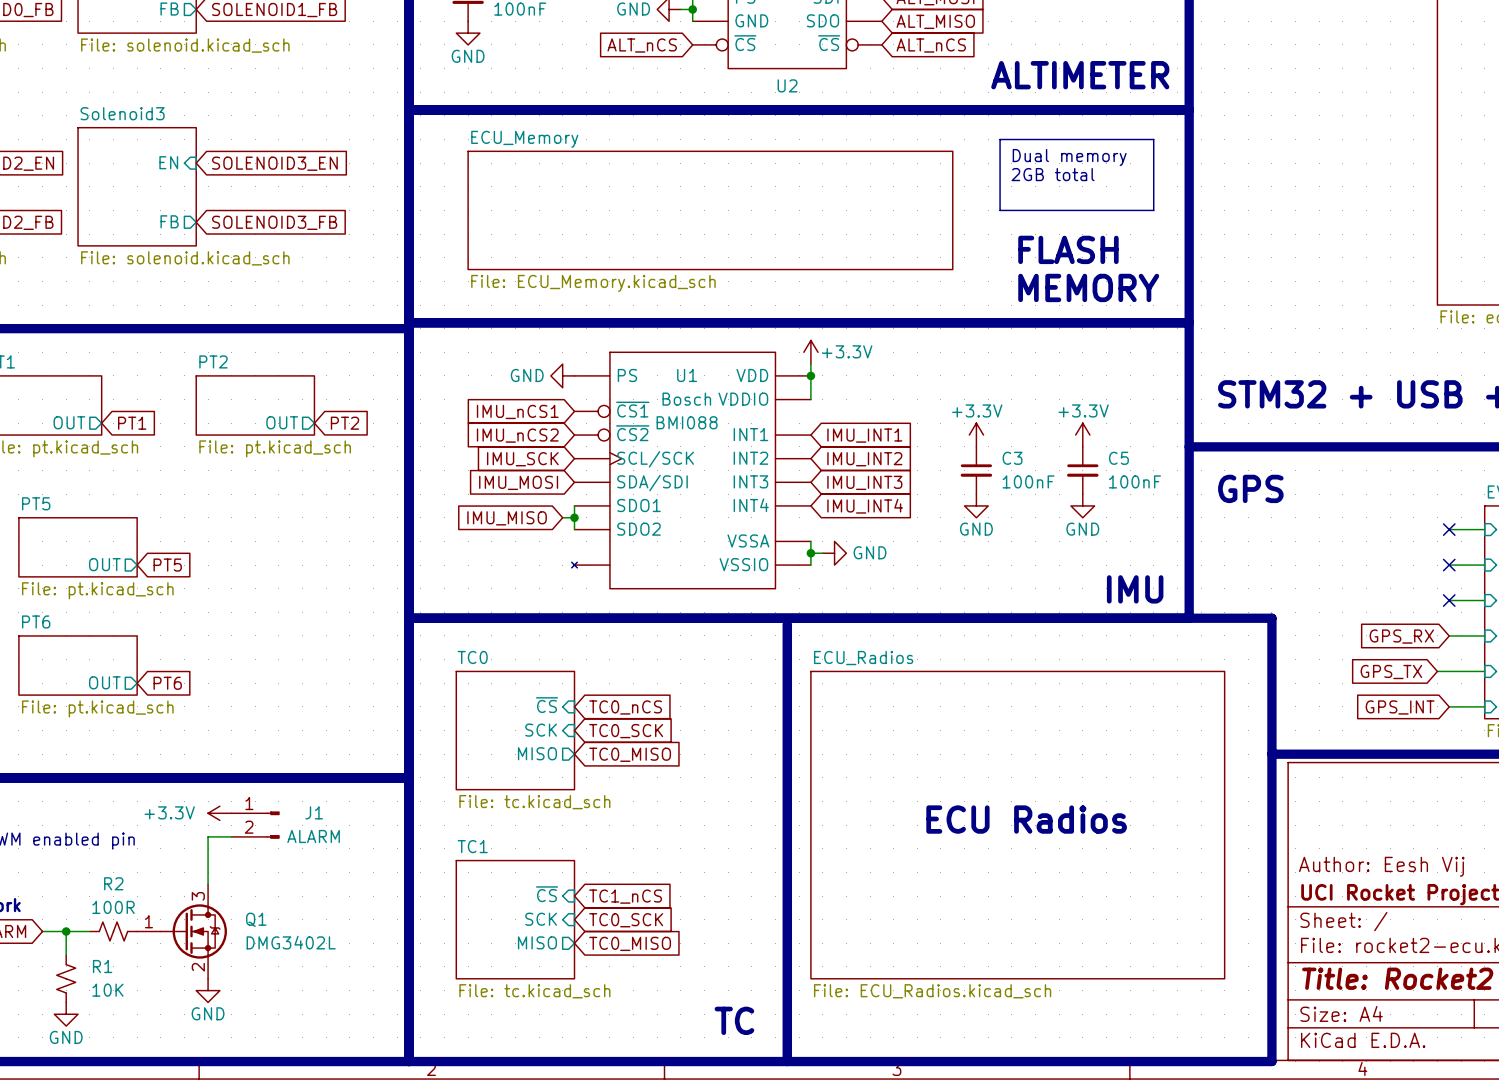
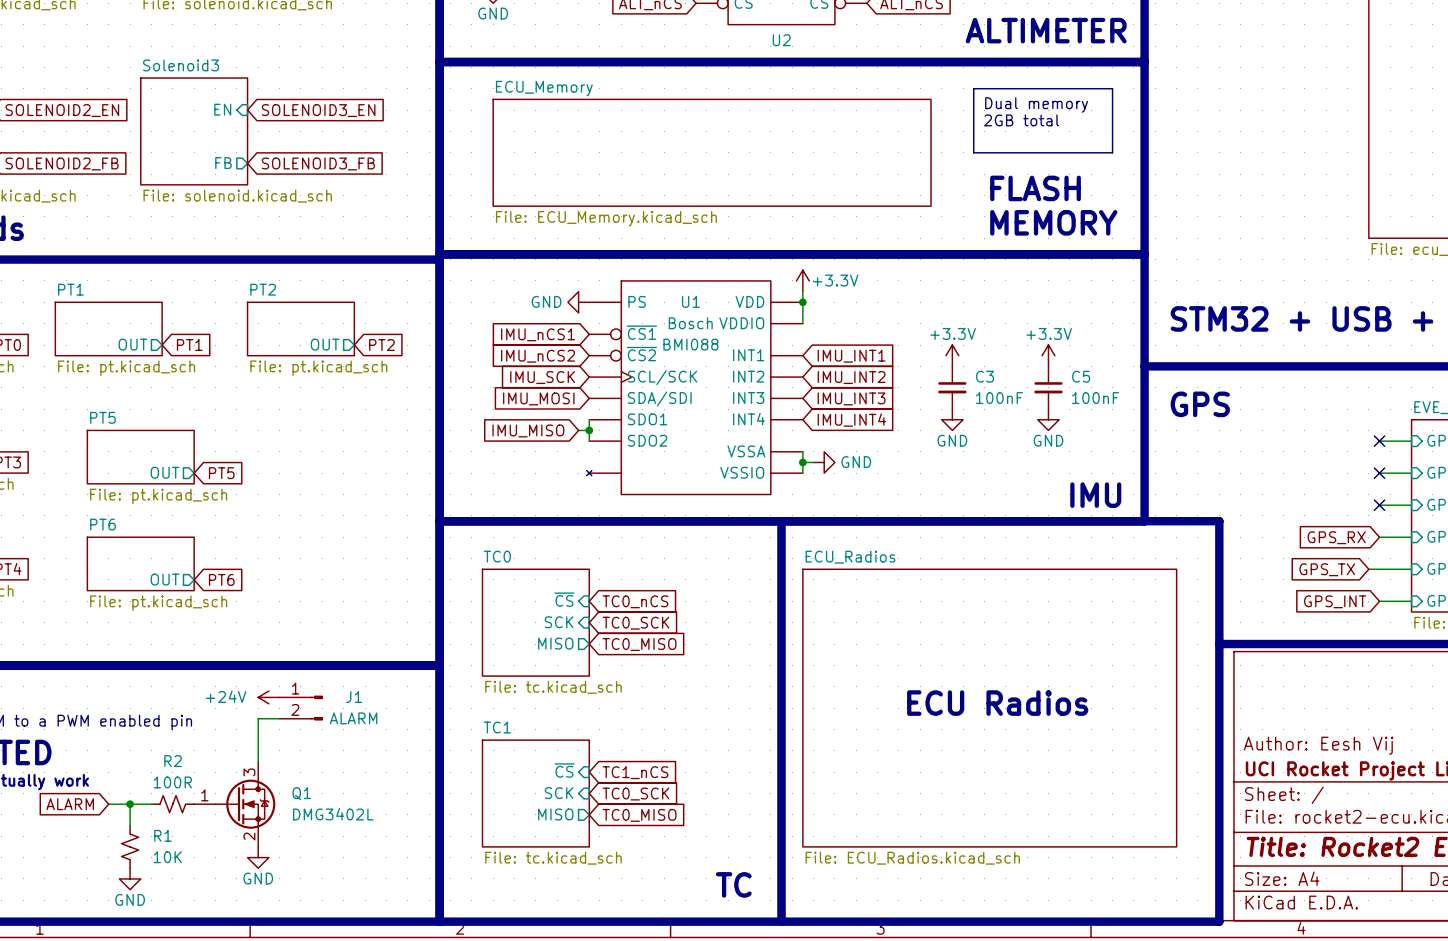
power symbol: +3.3V (219, 813) -> +24V (268, 697)

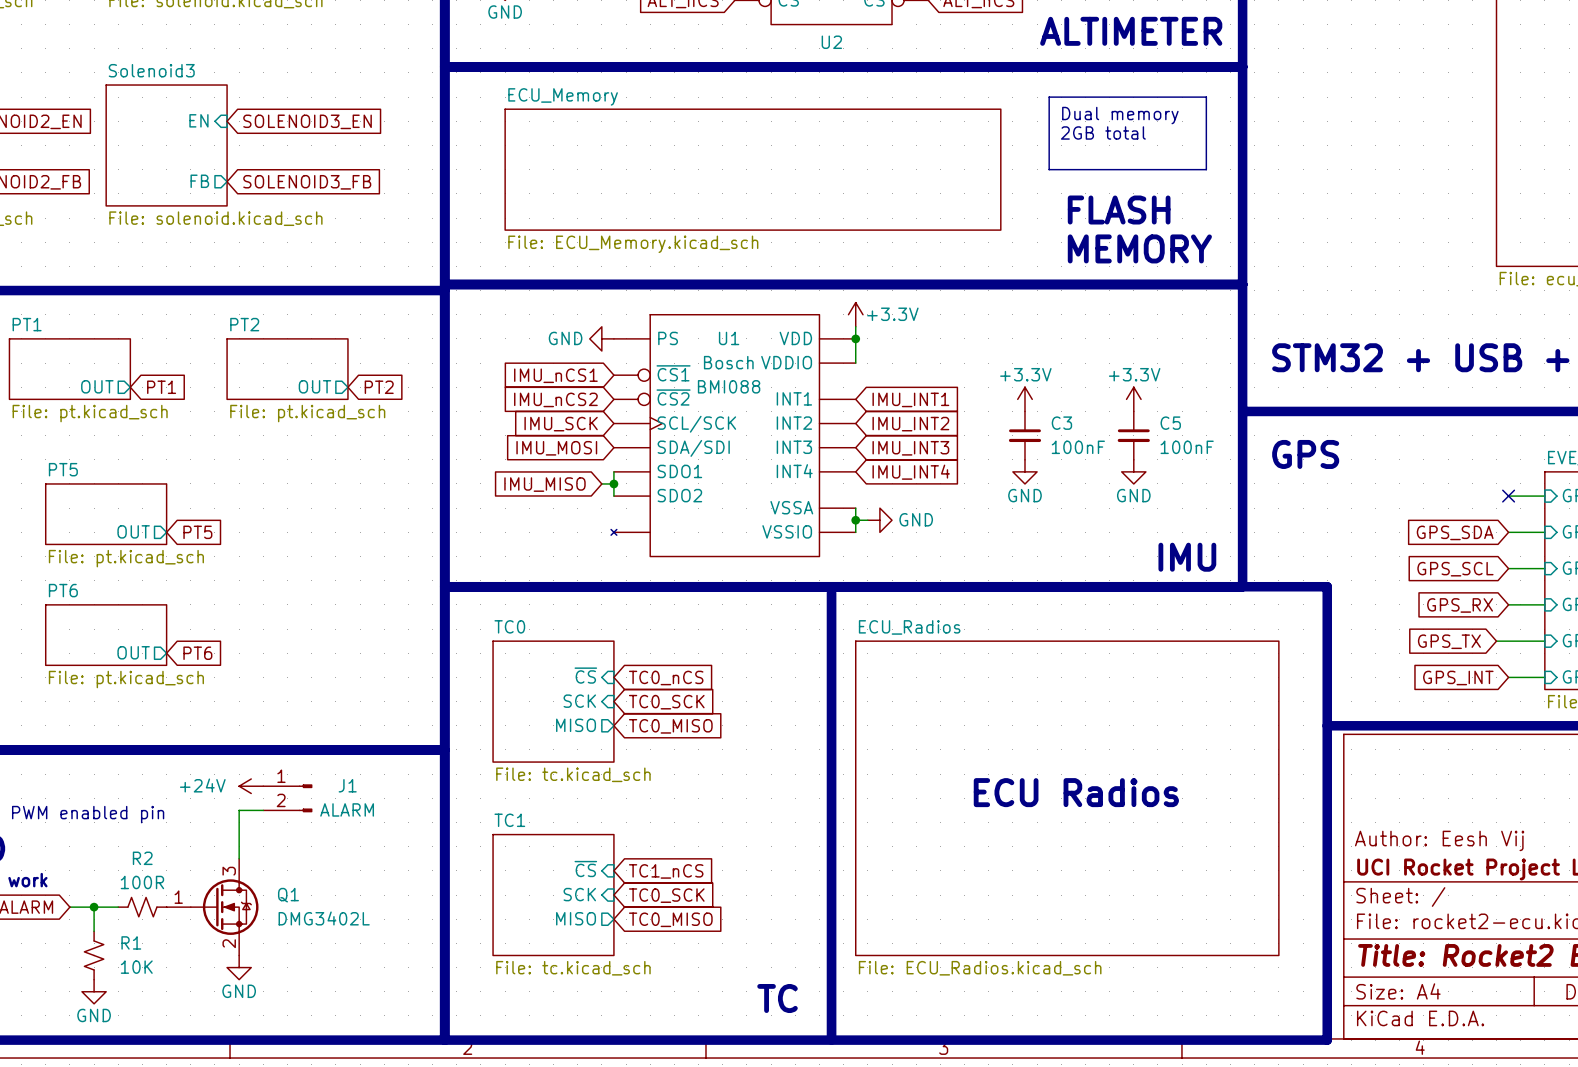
global label: none -> GPS_SDA (1455, 532)
no-connect mark: (1379, 473) -> none
global label: none -> GPS_SCL (1455, 569)
no-connect mark: (1379, 505) -> none

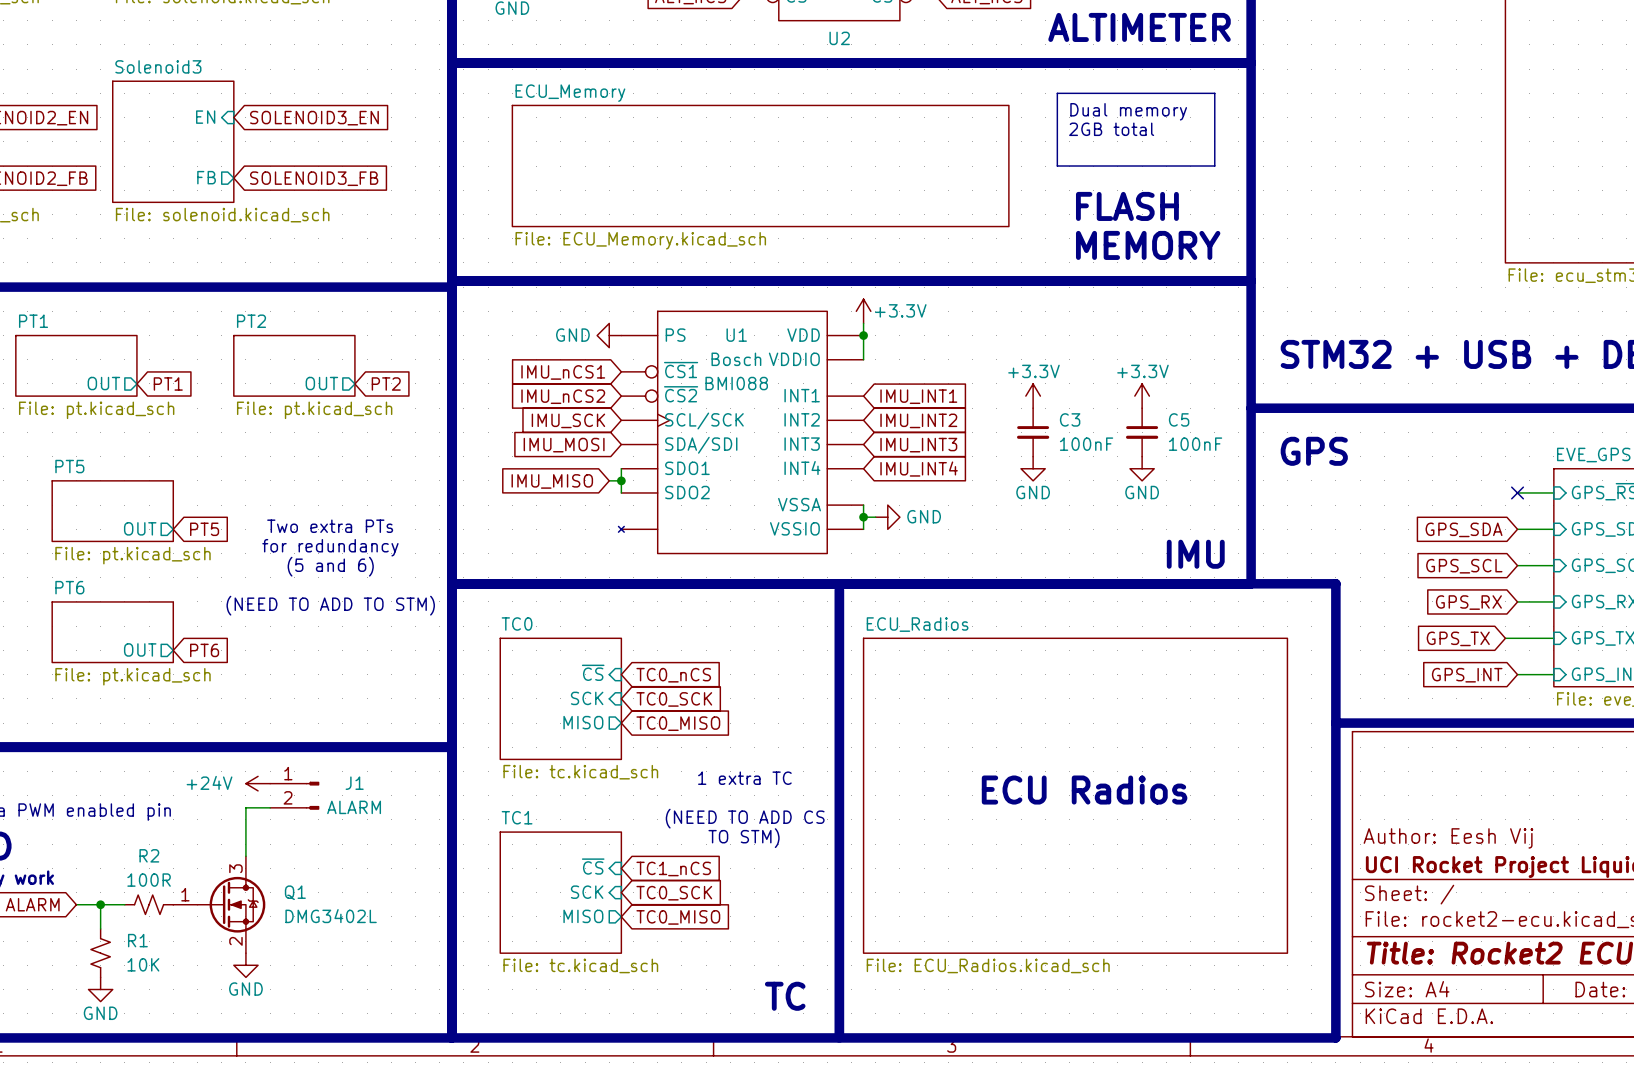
text: none -> Two extra PTs (330, 526)
text: none -> for redundancy (330, 547)
text: none -> (5 and 6) (330, 566)
text: none -> (NEED TO ADD TO STM) (330, 605)
text: none -> 1 extra TC (744, 778)
text: none -> (NEED TO ADD CS (745, 818)
text: none -> TO STM) (744, 838)

